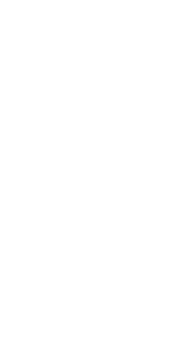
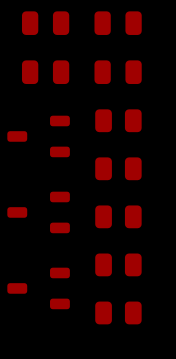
part: none -> (45, 23)
part: none -> (118, 23)
part: none -> (45, 72)
part: none -> (118, 72)
part: none -> (118, 120)
part: none -> (38, 136)
part: none -> (118, 168)
part: none -> (38, 212)
part: none -> (118, 216)
part: none -> (118, 264)
part: none -> (38, 288)
part: none -> (118, 312)

